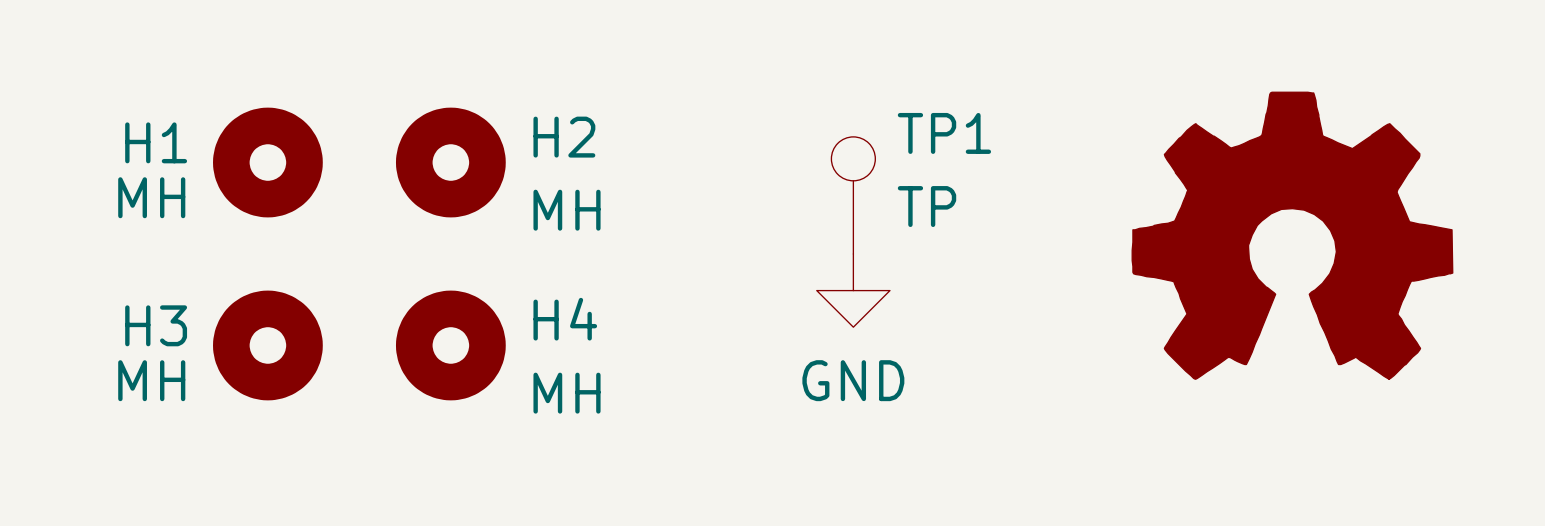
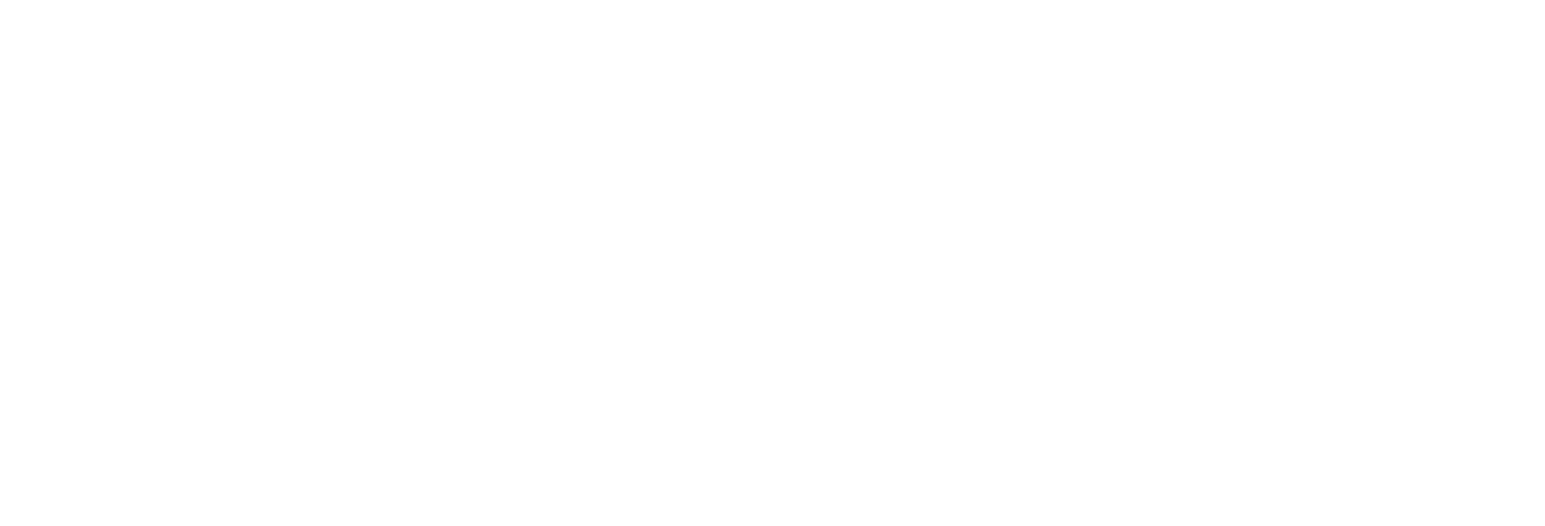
H1: MH (267, 162) -> none
H2: MH (450, 162) -> none
TP1: TP (853, 195) -> none
power symbol: (1292, 235) -> none
power symbol: GND (853, 290) -> none
H3: MH (267, 345) -> none
H4: MH (450, 345) -> none

